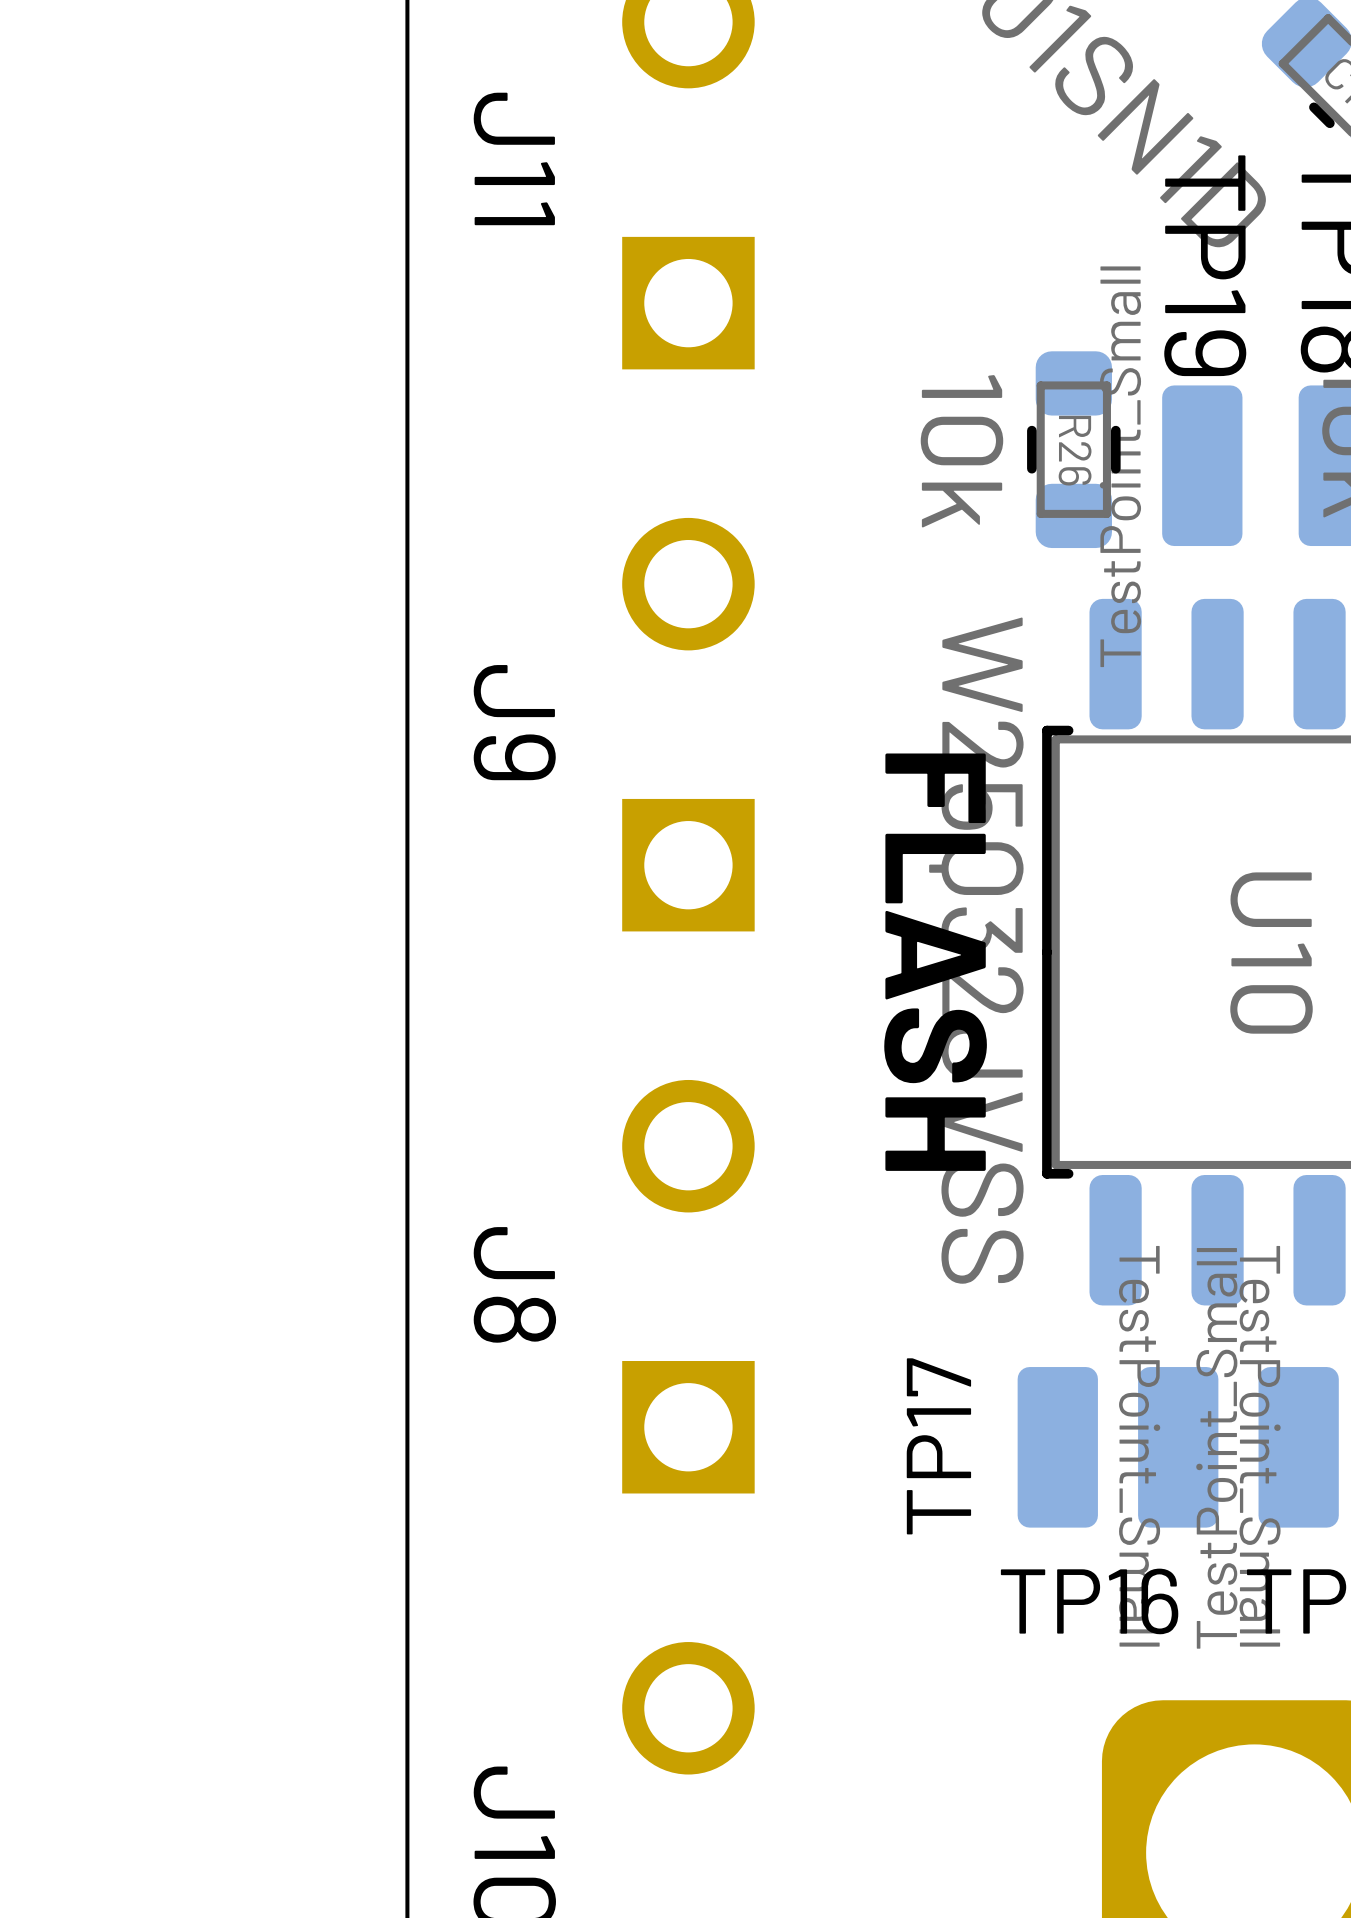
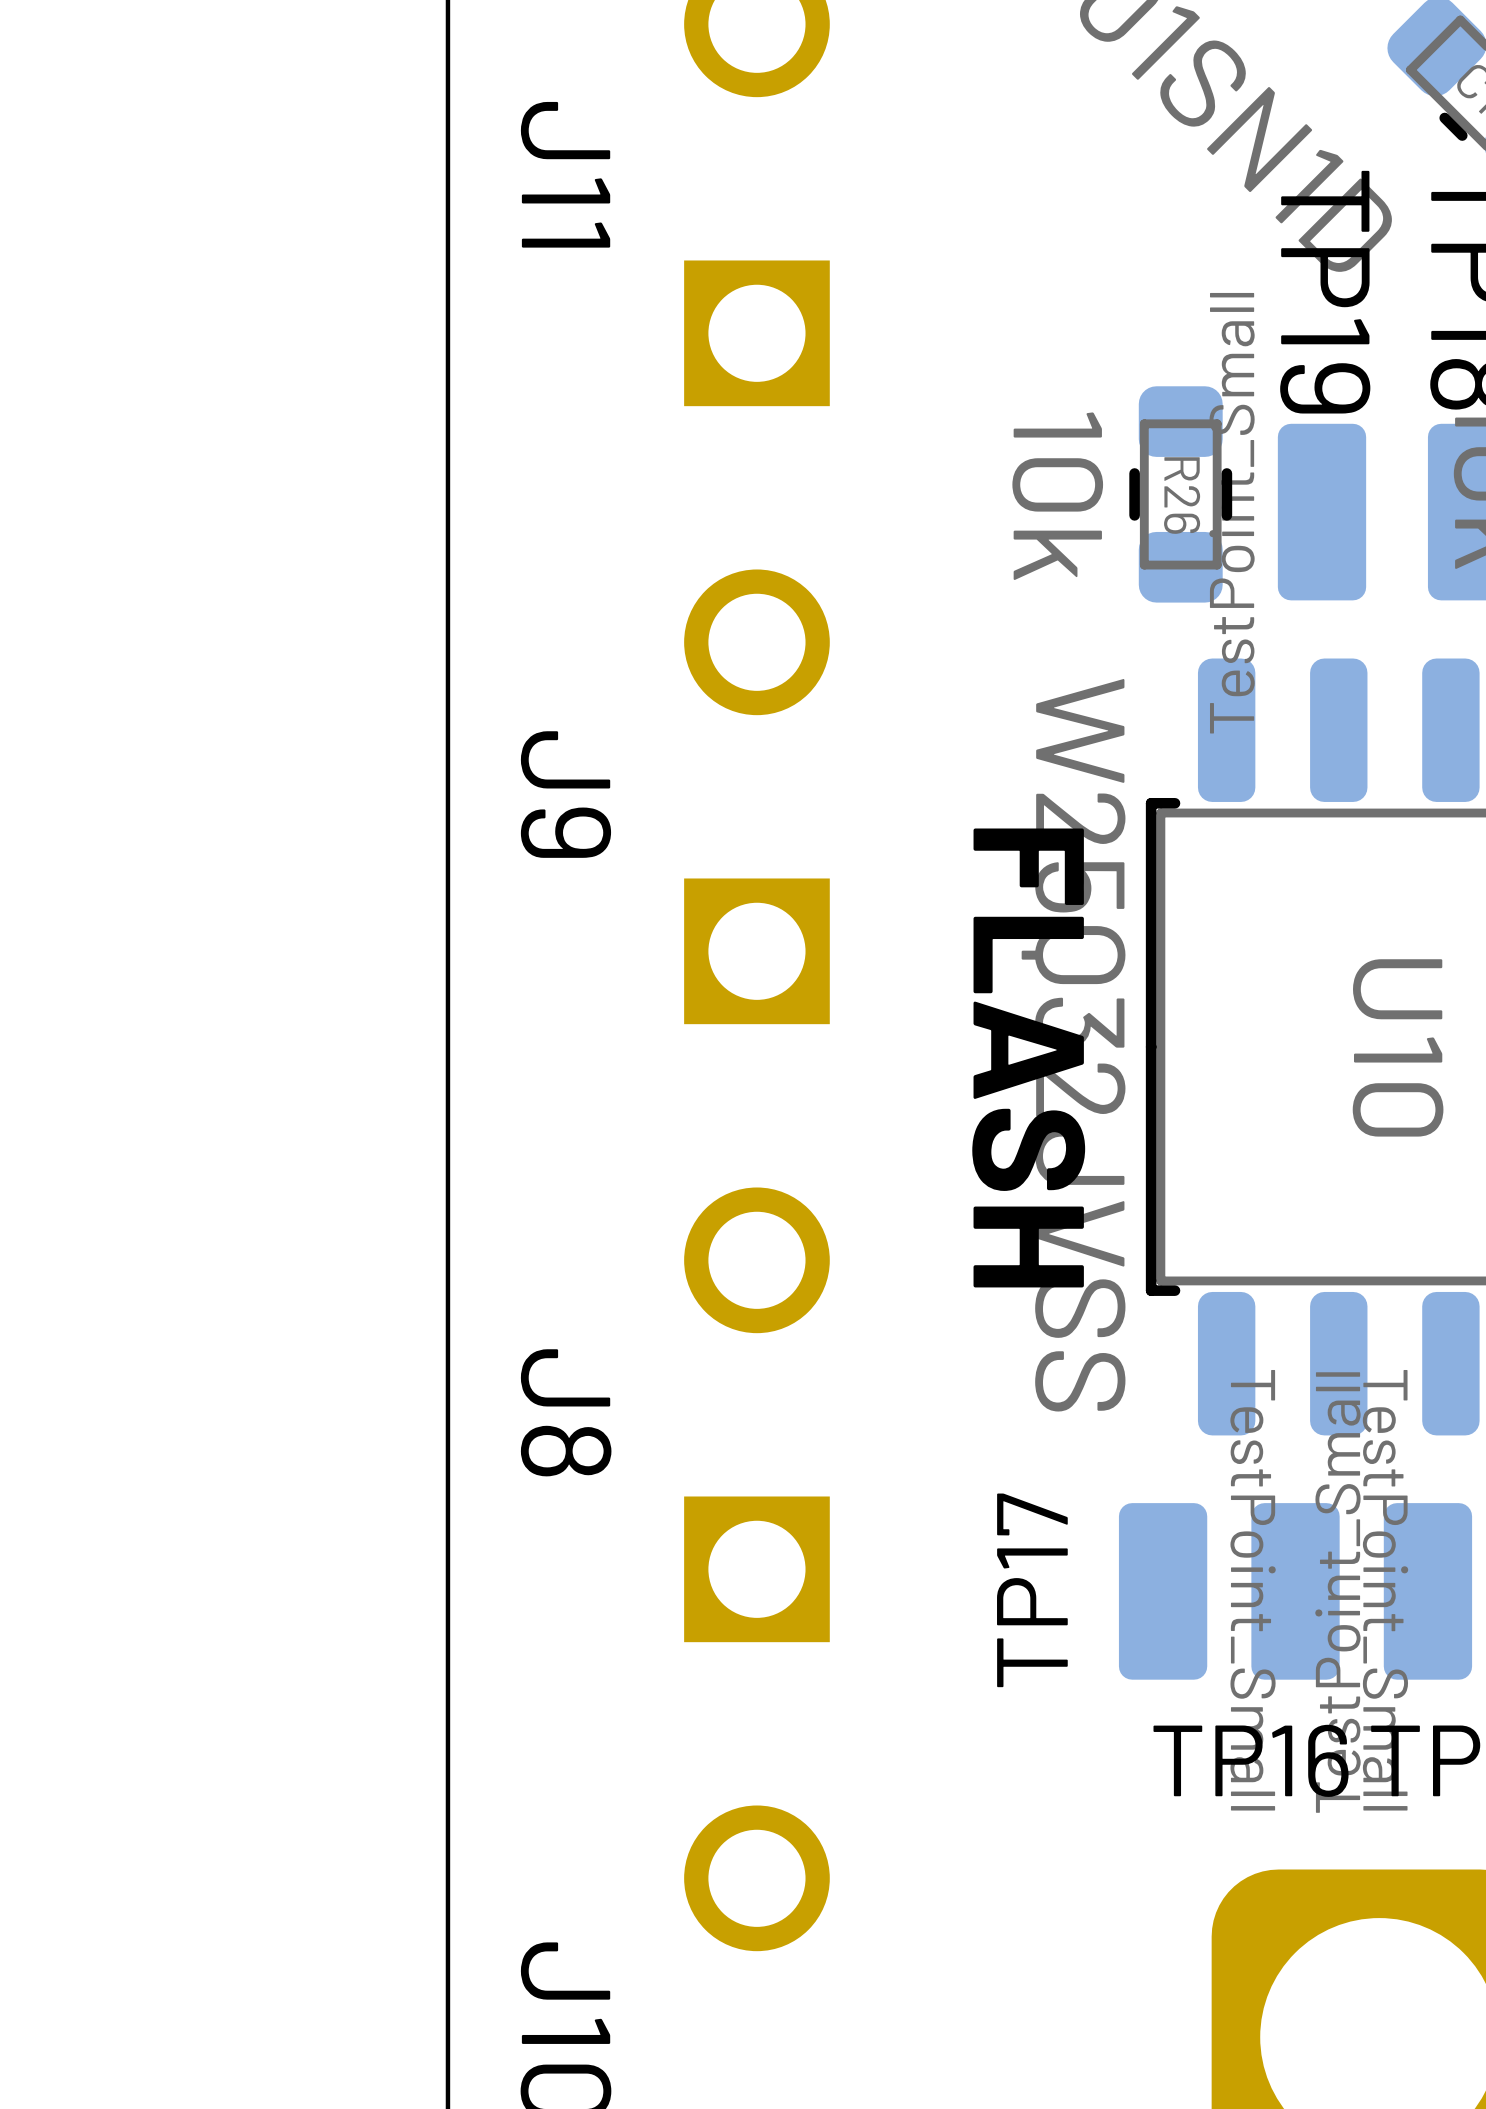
TP16 name position: TP16 (1089, 1601) -> TP16 (1251, 1760)

